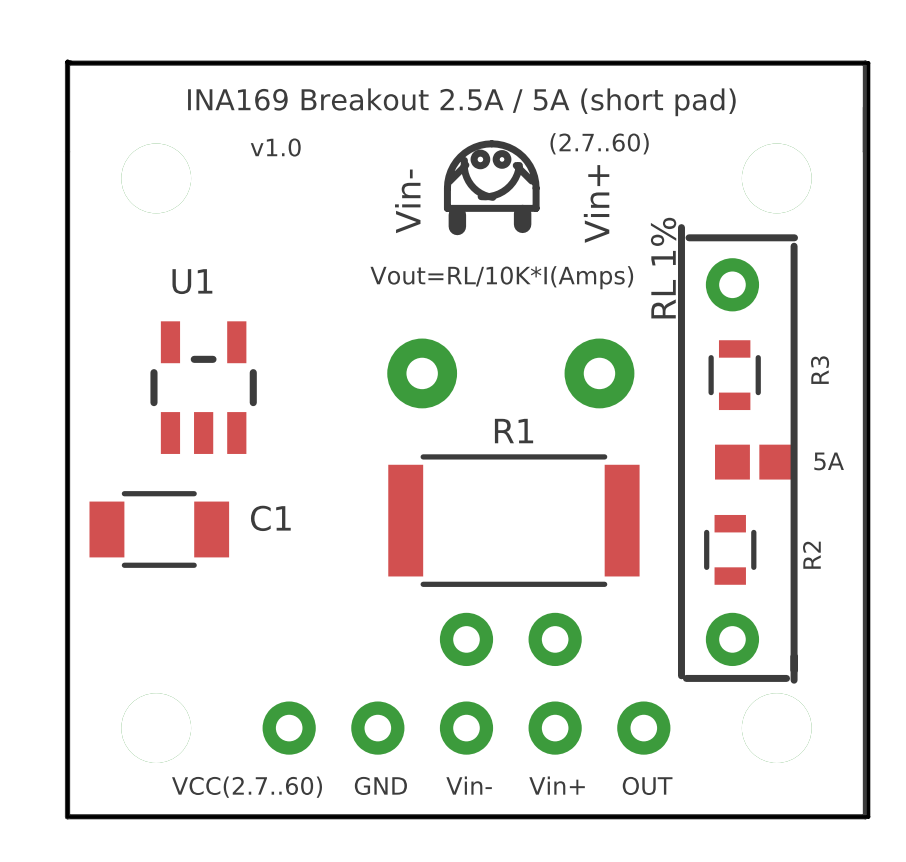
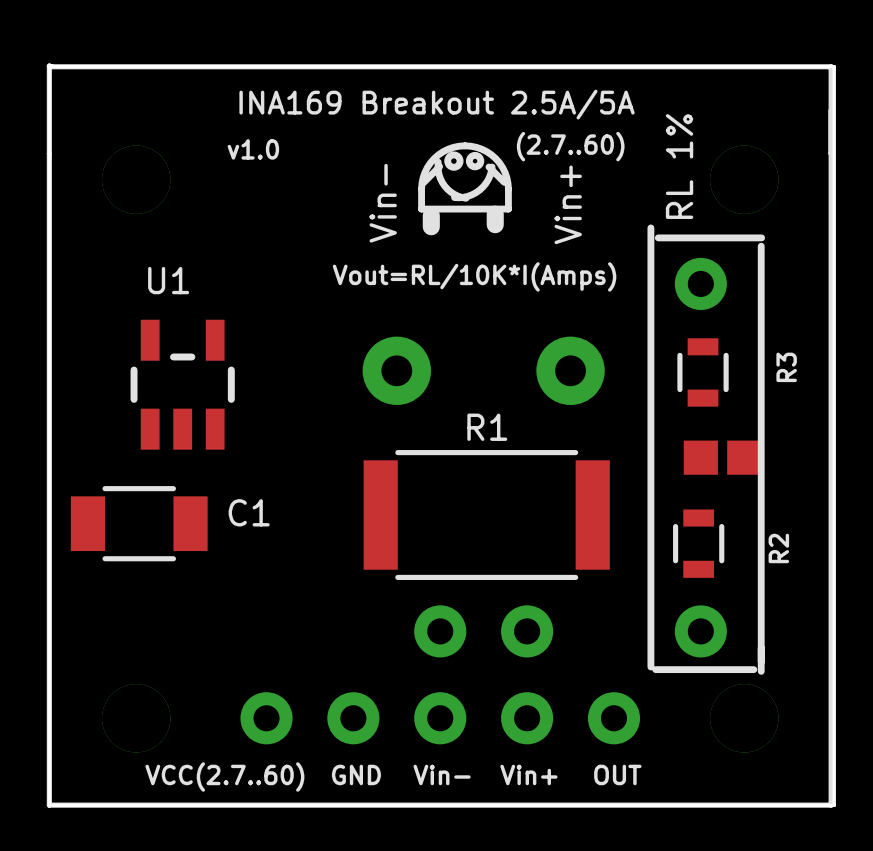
part value: INA169 Breakout 2.5A / 5A (short pad) (461, 102) -> INA169 Breakout 2.5A/5A (437, 104)
text position: RL 1% (663, 268) -> RL 1% (679, 166)
text: 5A (829, 461) -> none

